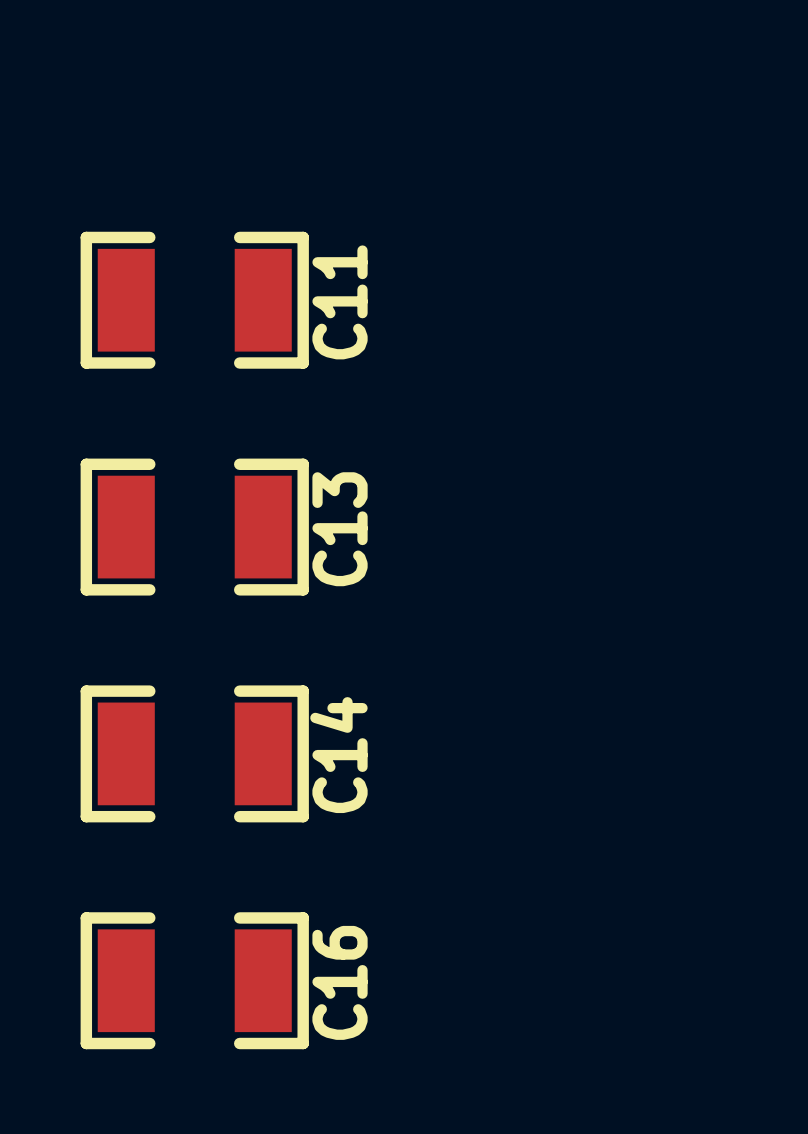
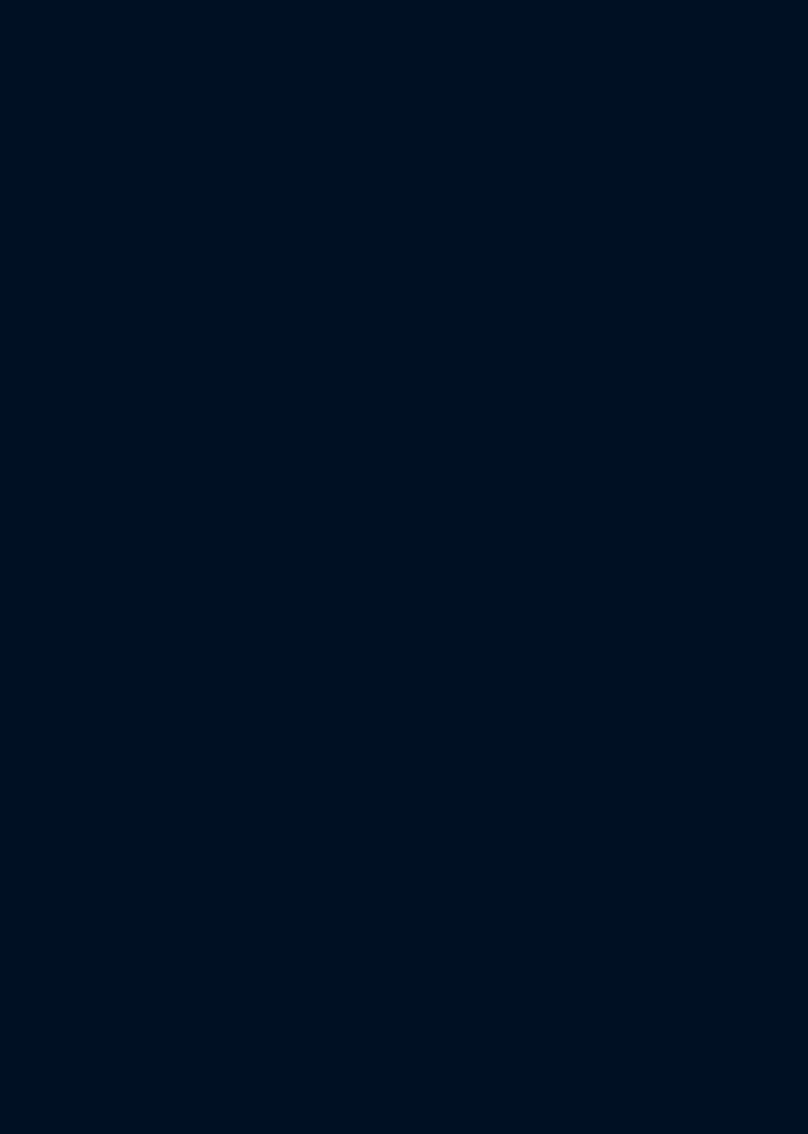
C11: (194, 300) -> none
C13: (194, 527) -> none
C14: (194, 753) -> none
C16: (194, 980) -> none

